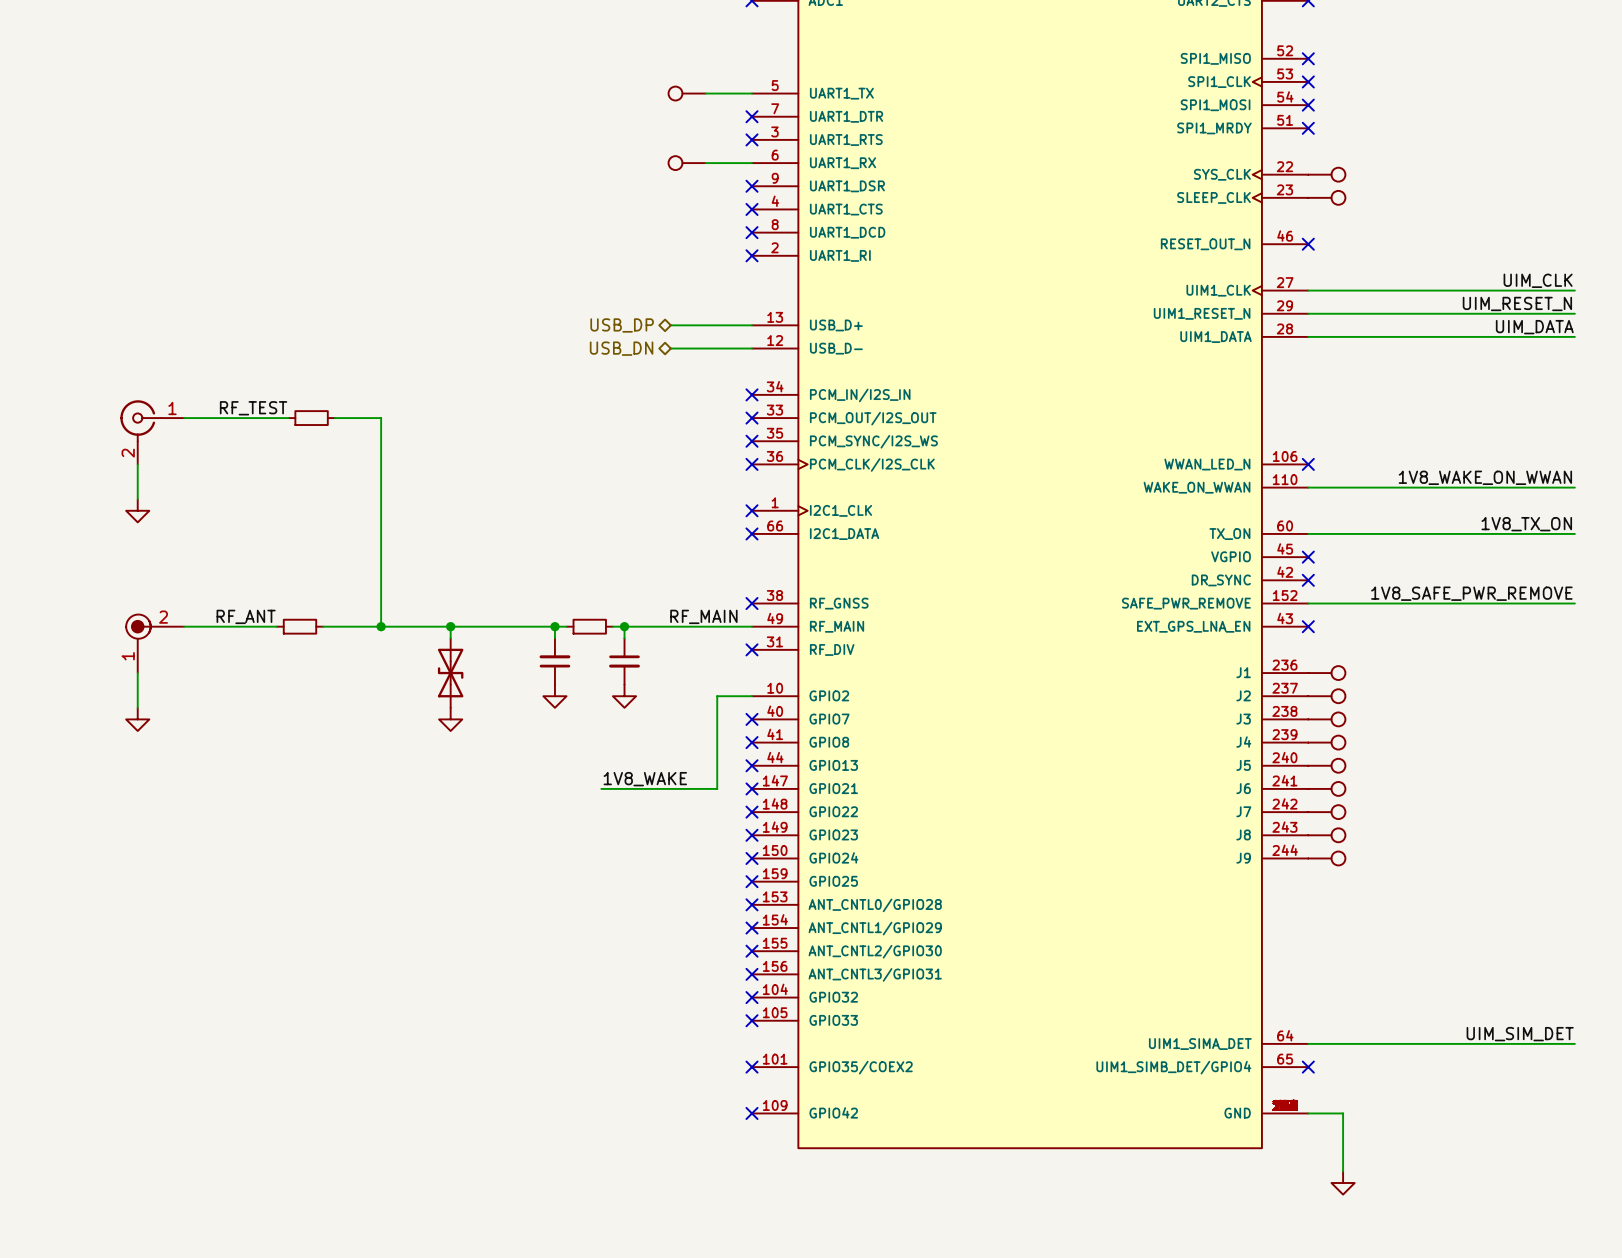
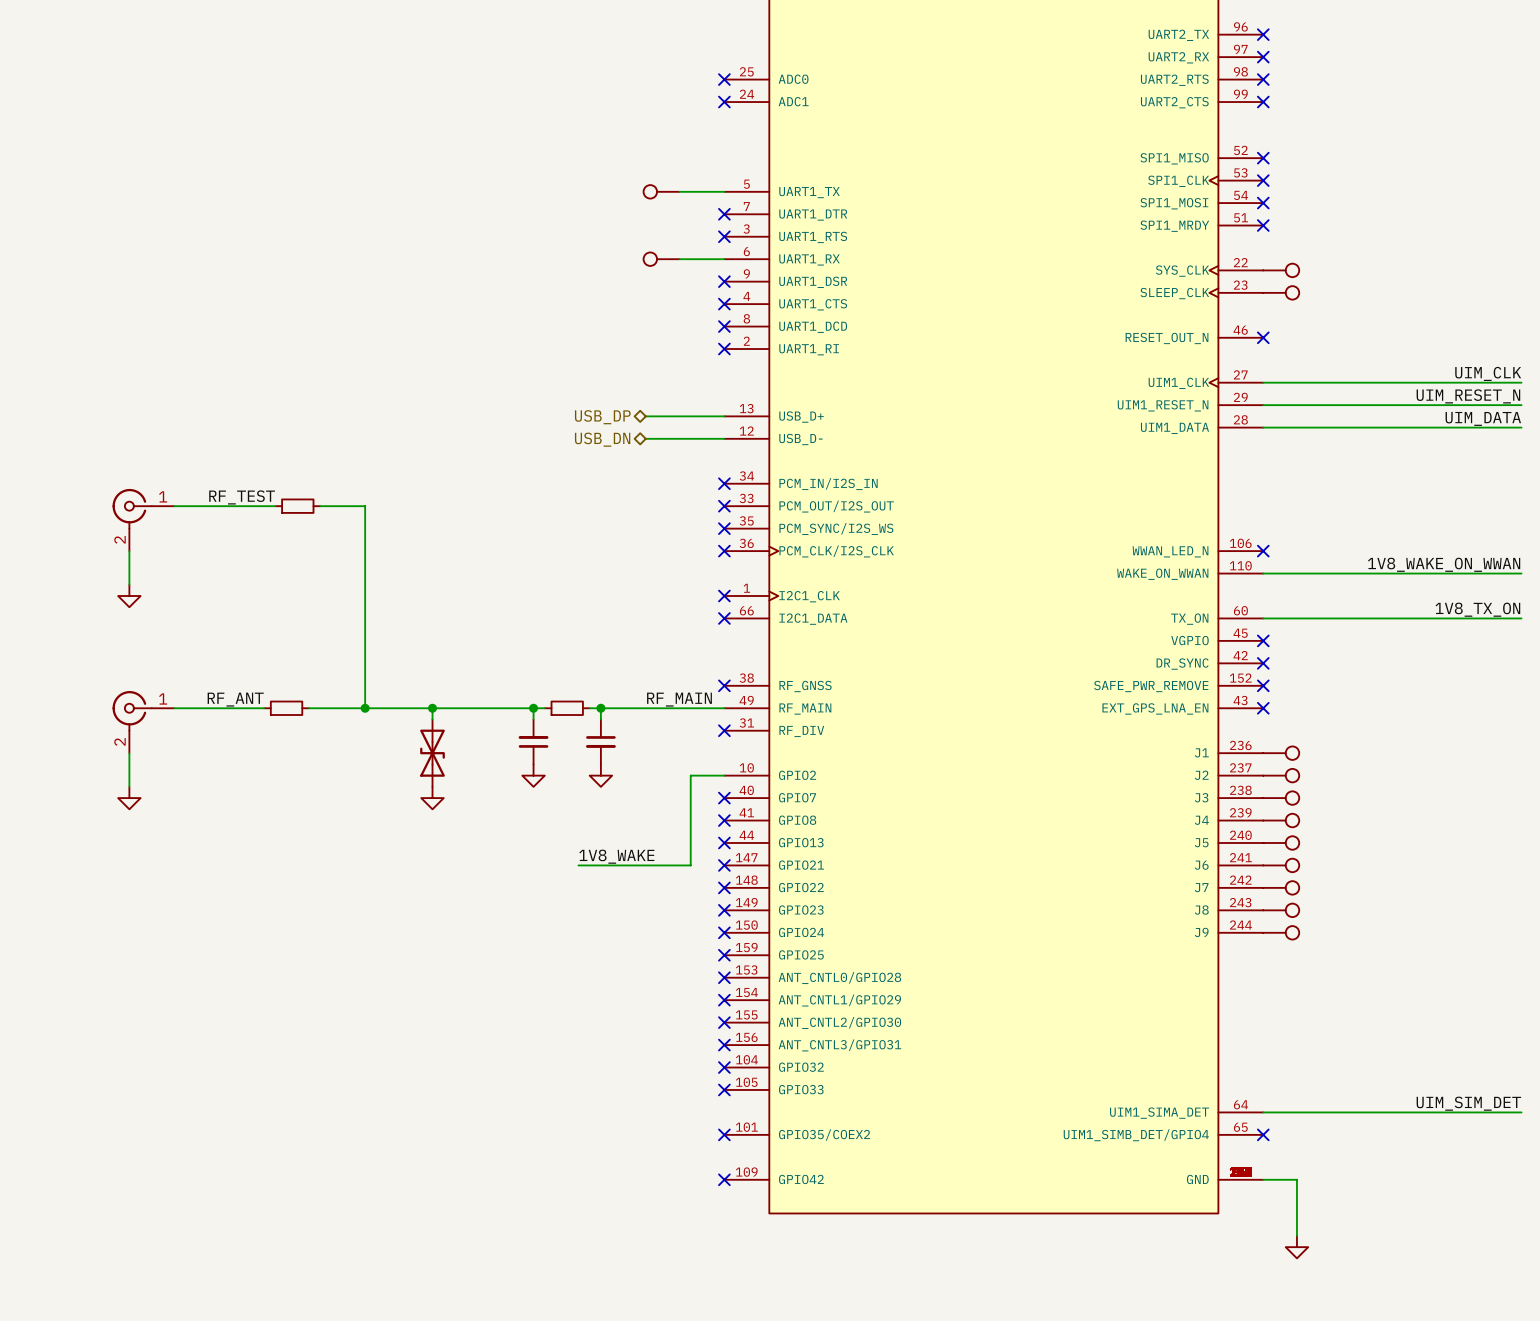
label: 1V8_SAFE_PWR_REMOVE (1471, 593) -> none
wire: (1308, 603) (1574, 603) -> none
no-connect mark: none -> (1263, 685)
part symbol: [126, 614, 185, 674] -> [112, 691, 175, 754]

